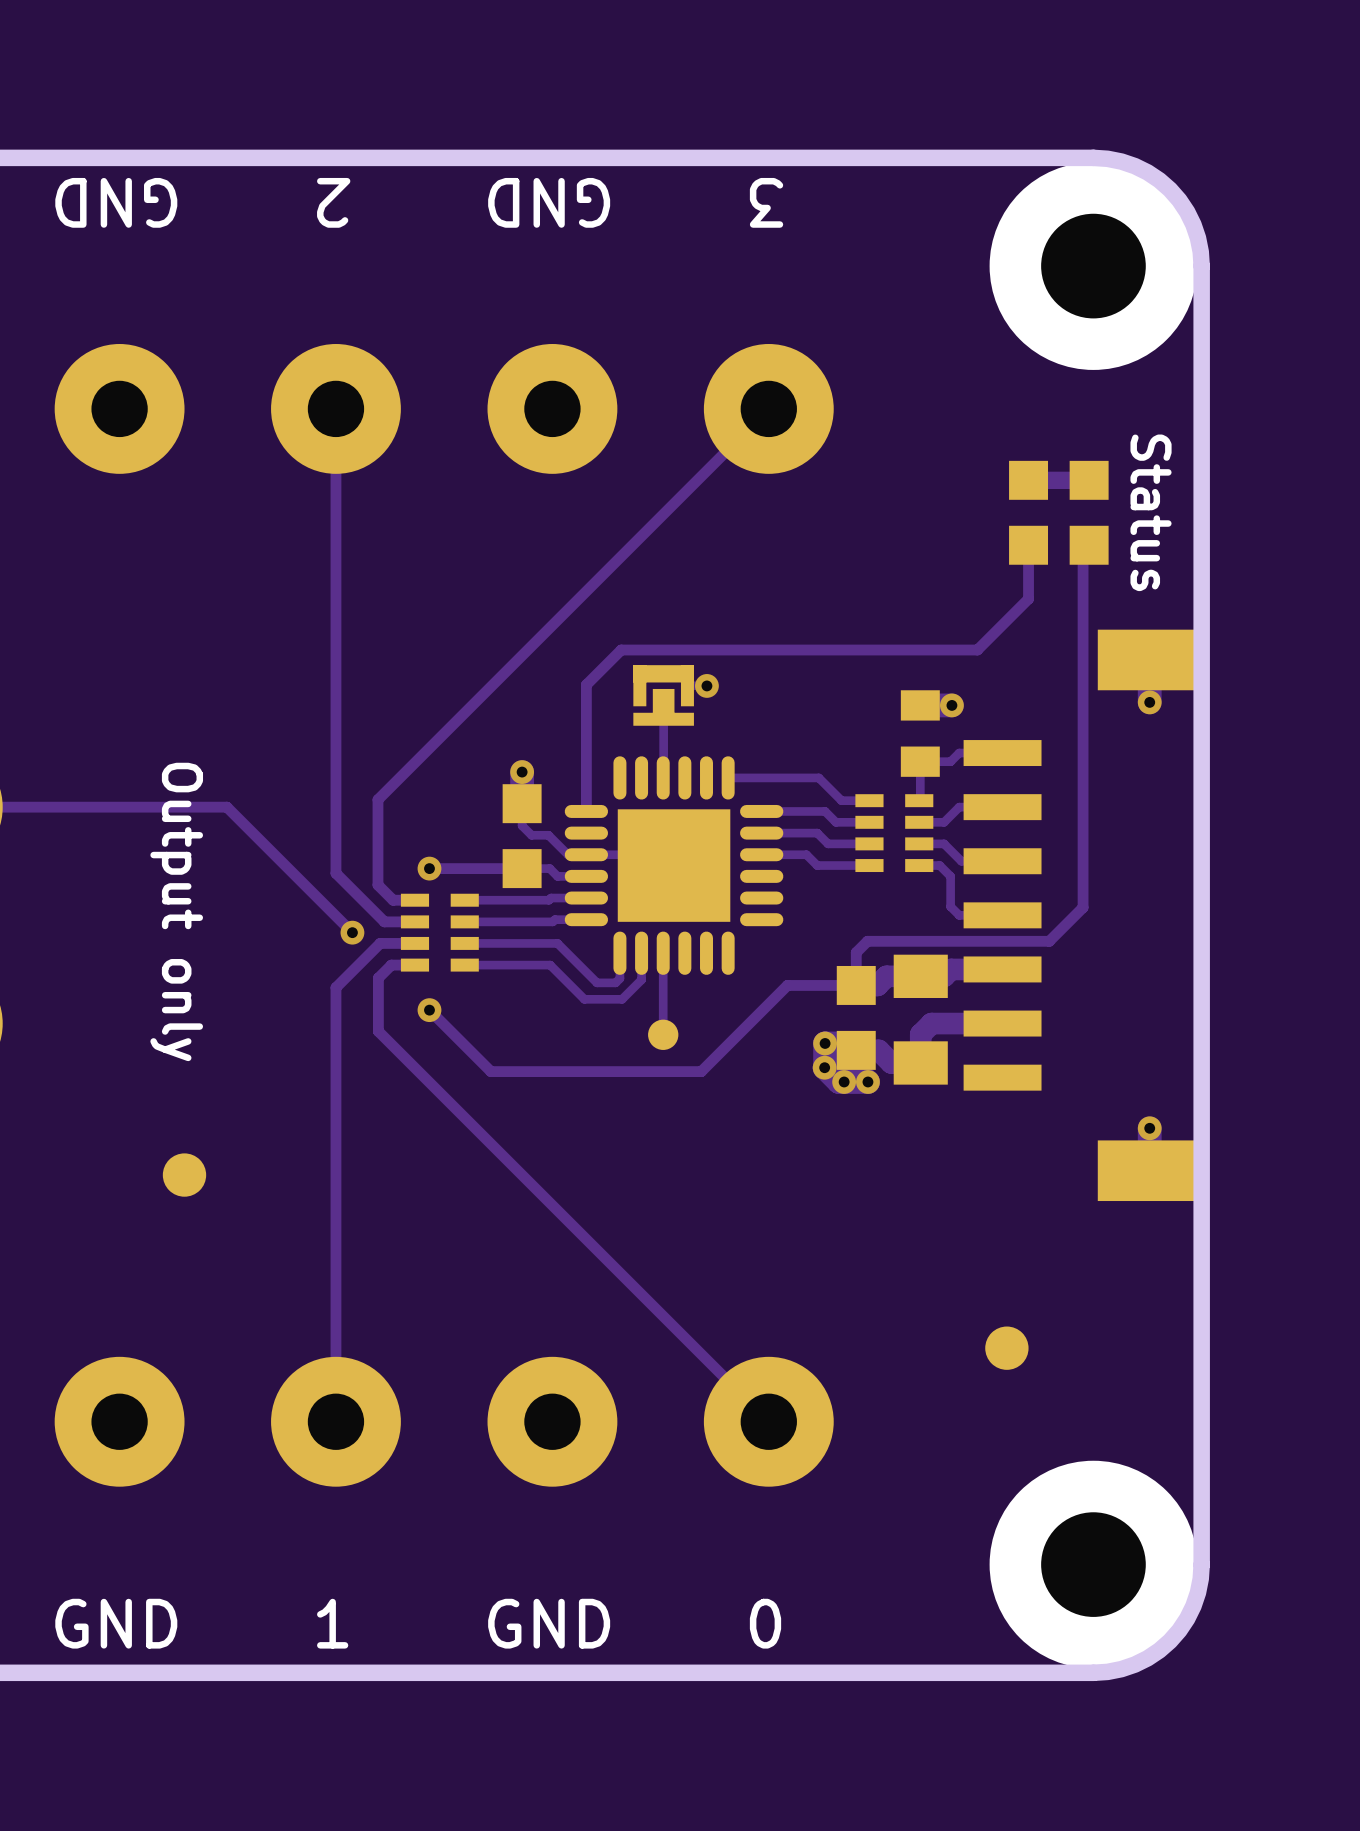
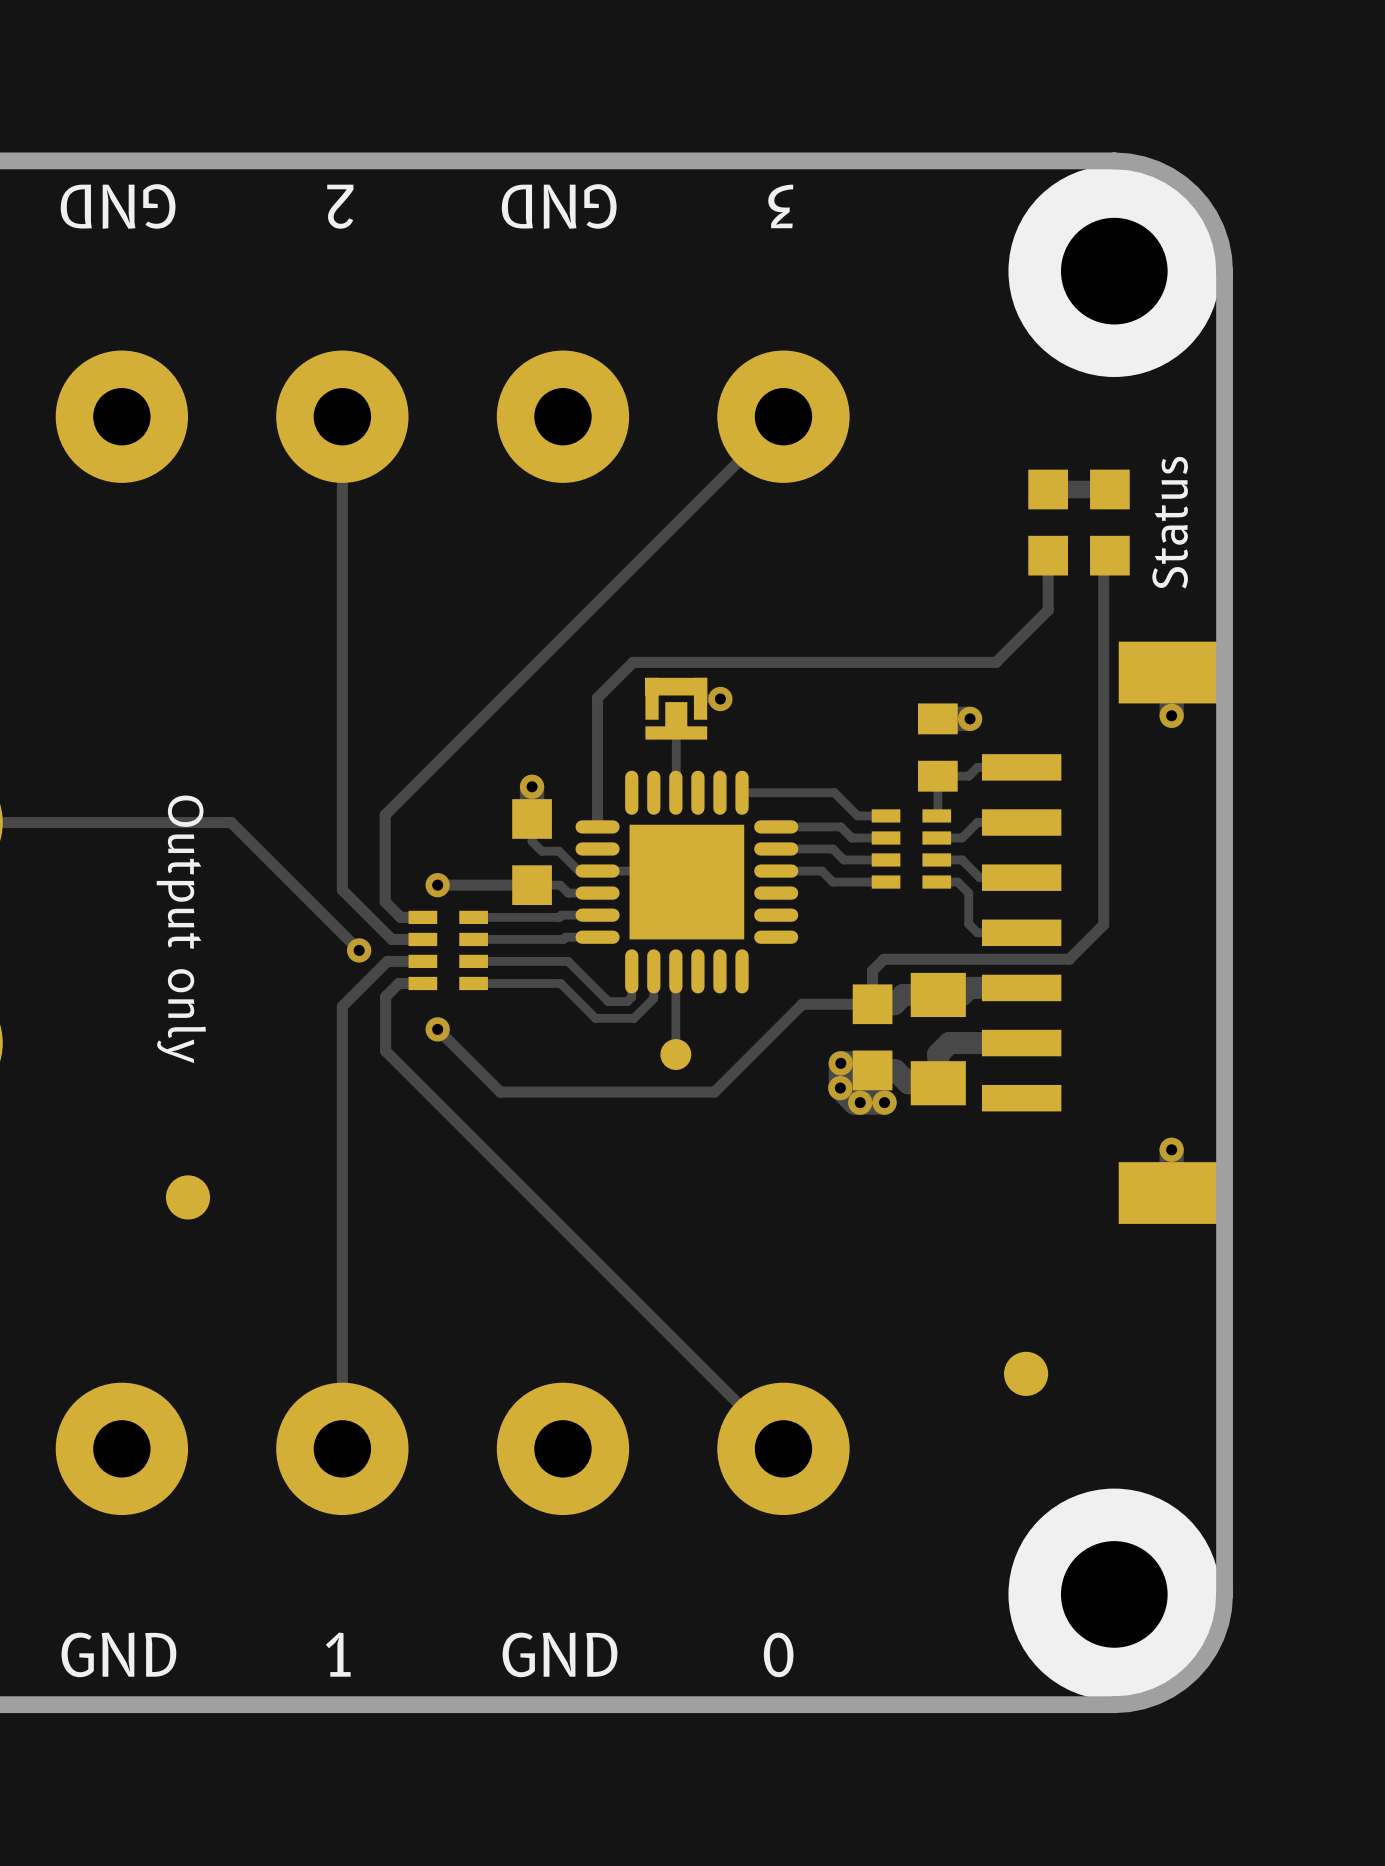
text rotation: 0° (1151, 512) -> 180° (1170, 522)

